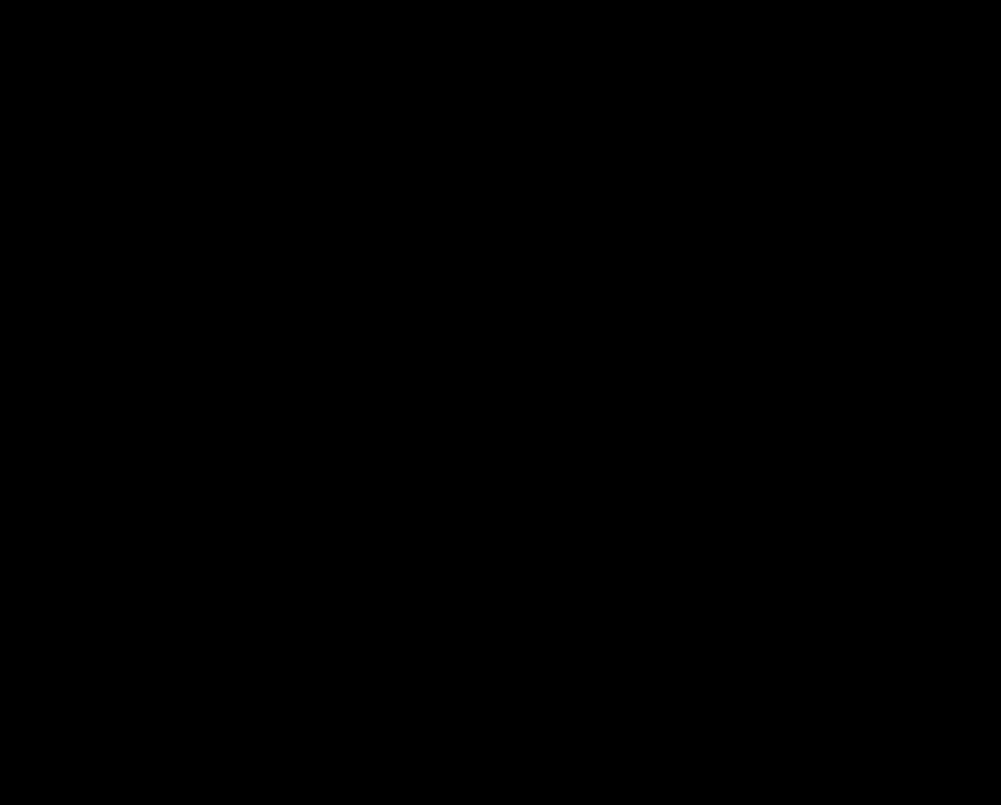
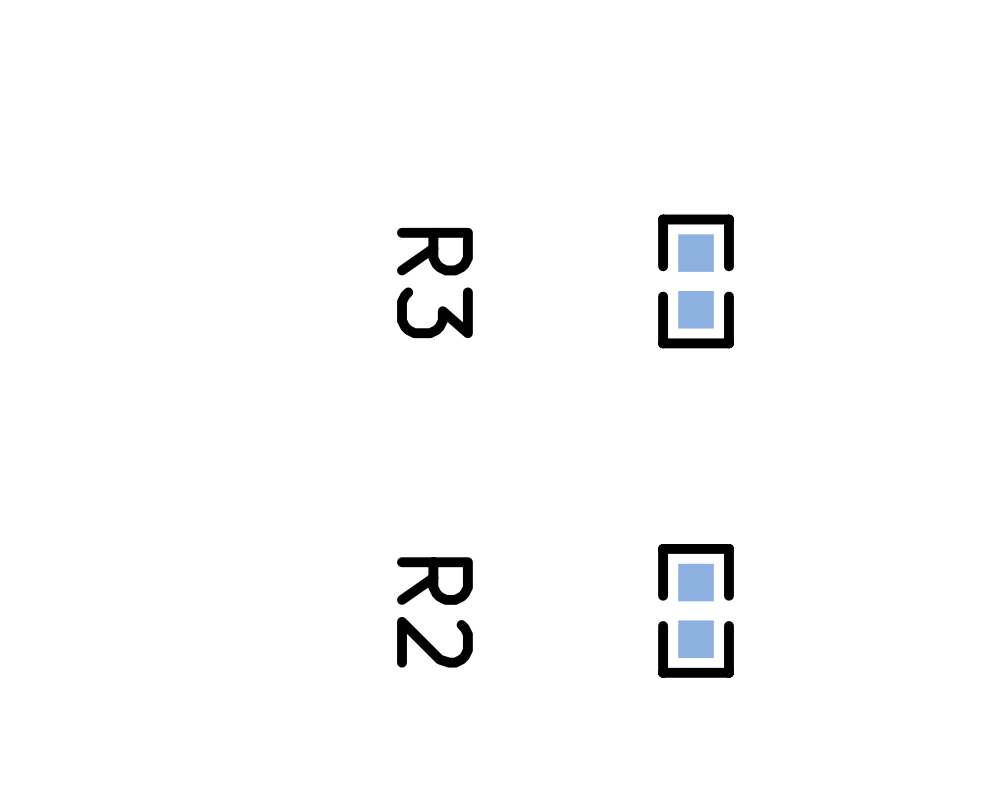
R3: none -> (696, 281)
R2: none -> (696, 610)

